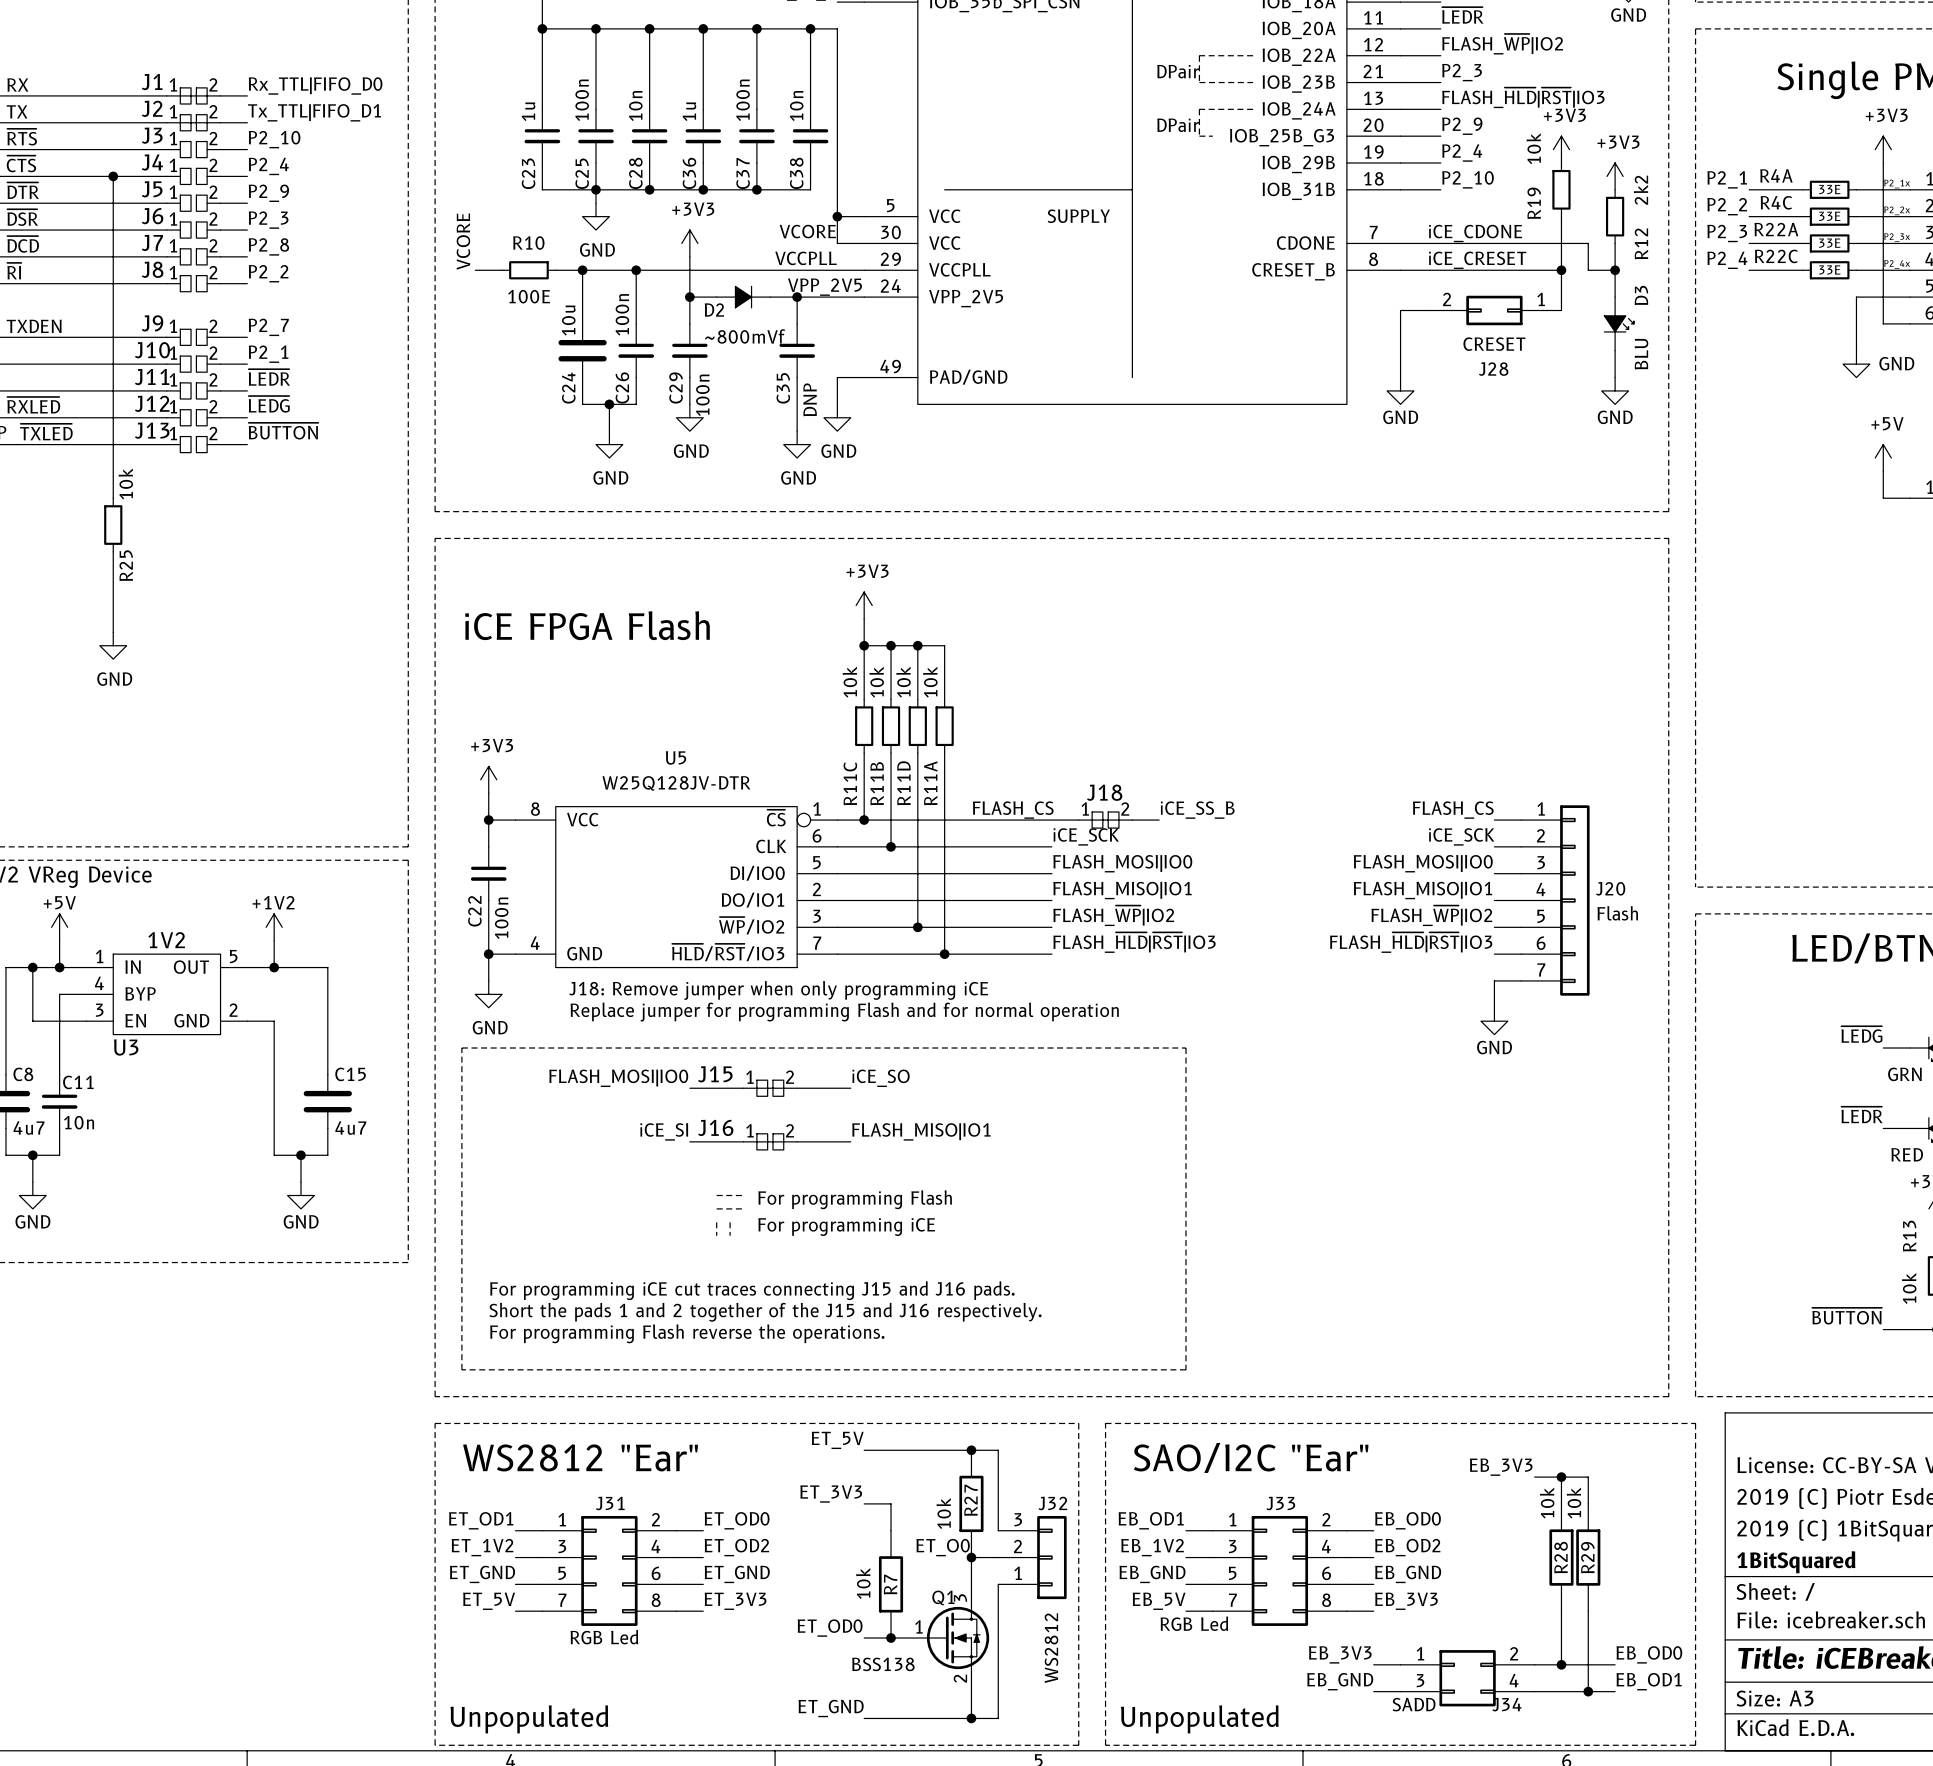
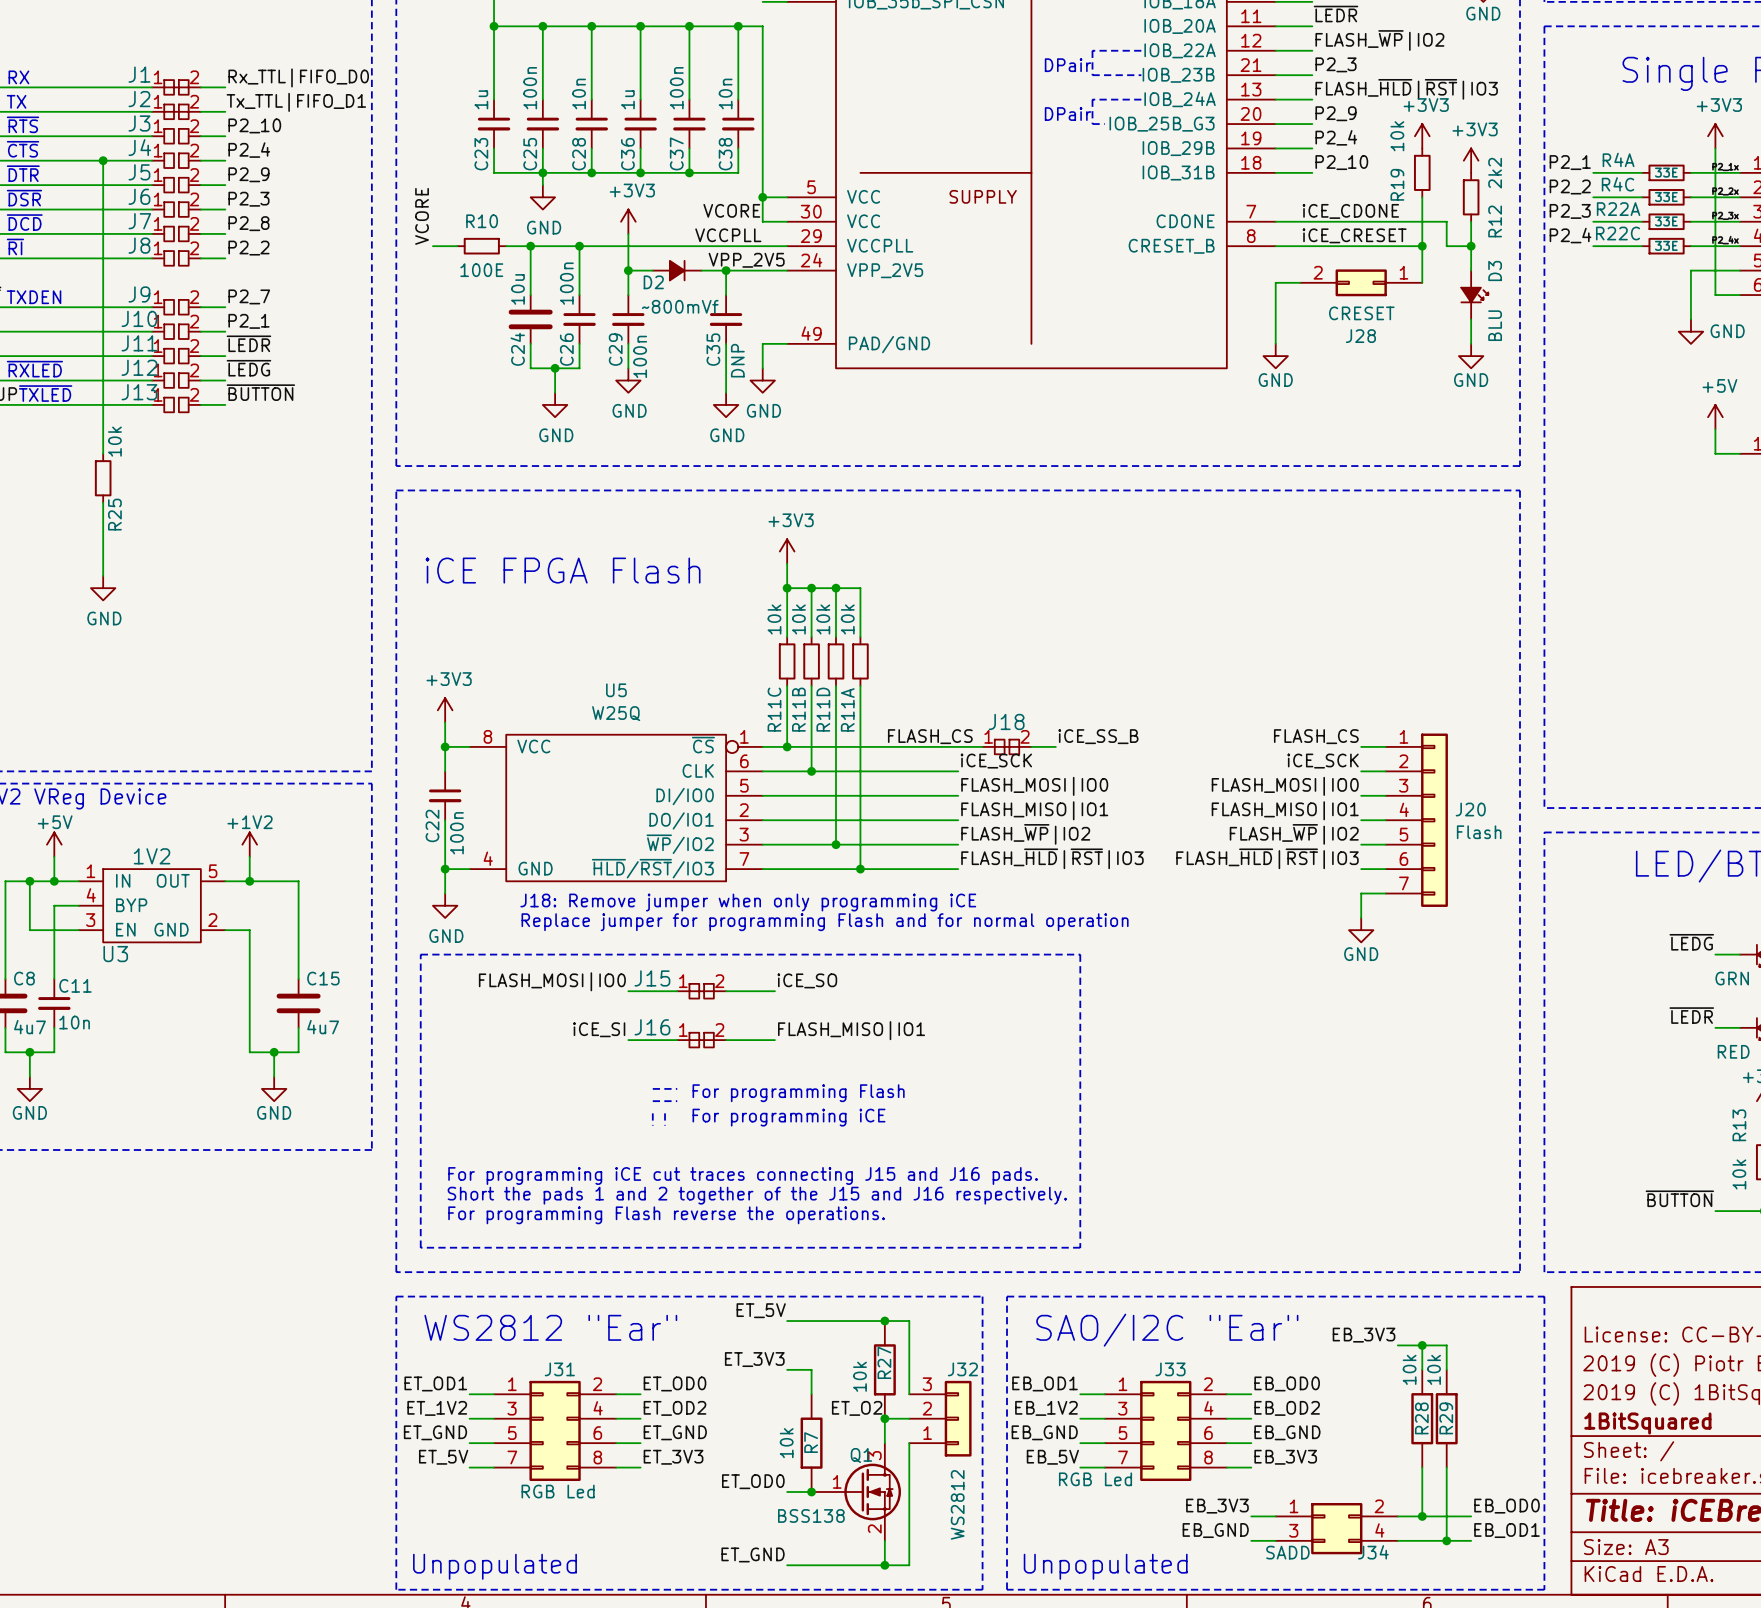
U5 value: W25Q128JV-DTR (676, 783) -> W25Q (616, 713)
label: ET_O0 (943, 1547) -> ET_O2 (857, 1408)

